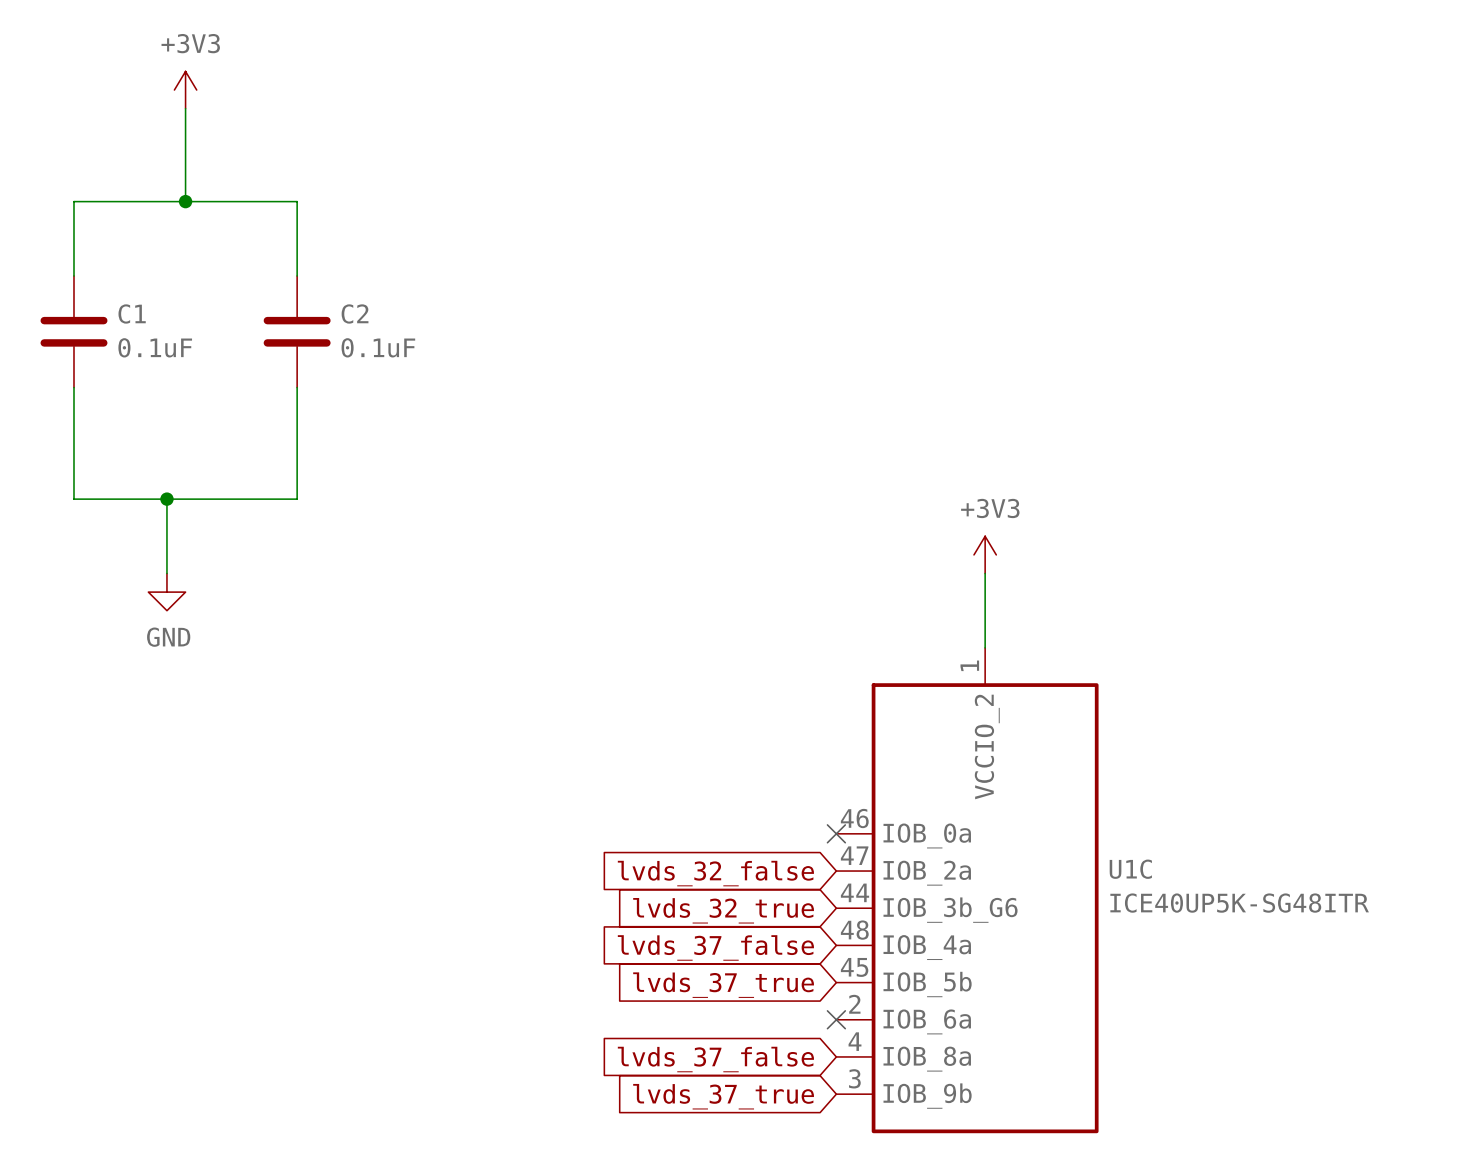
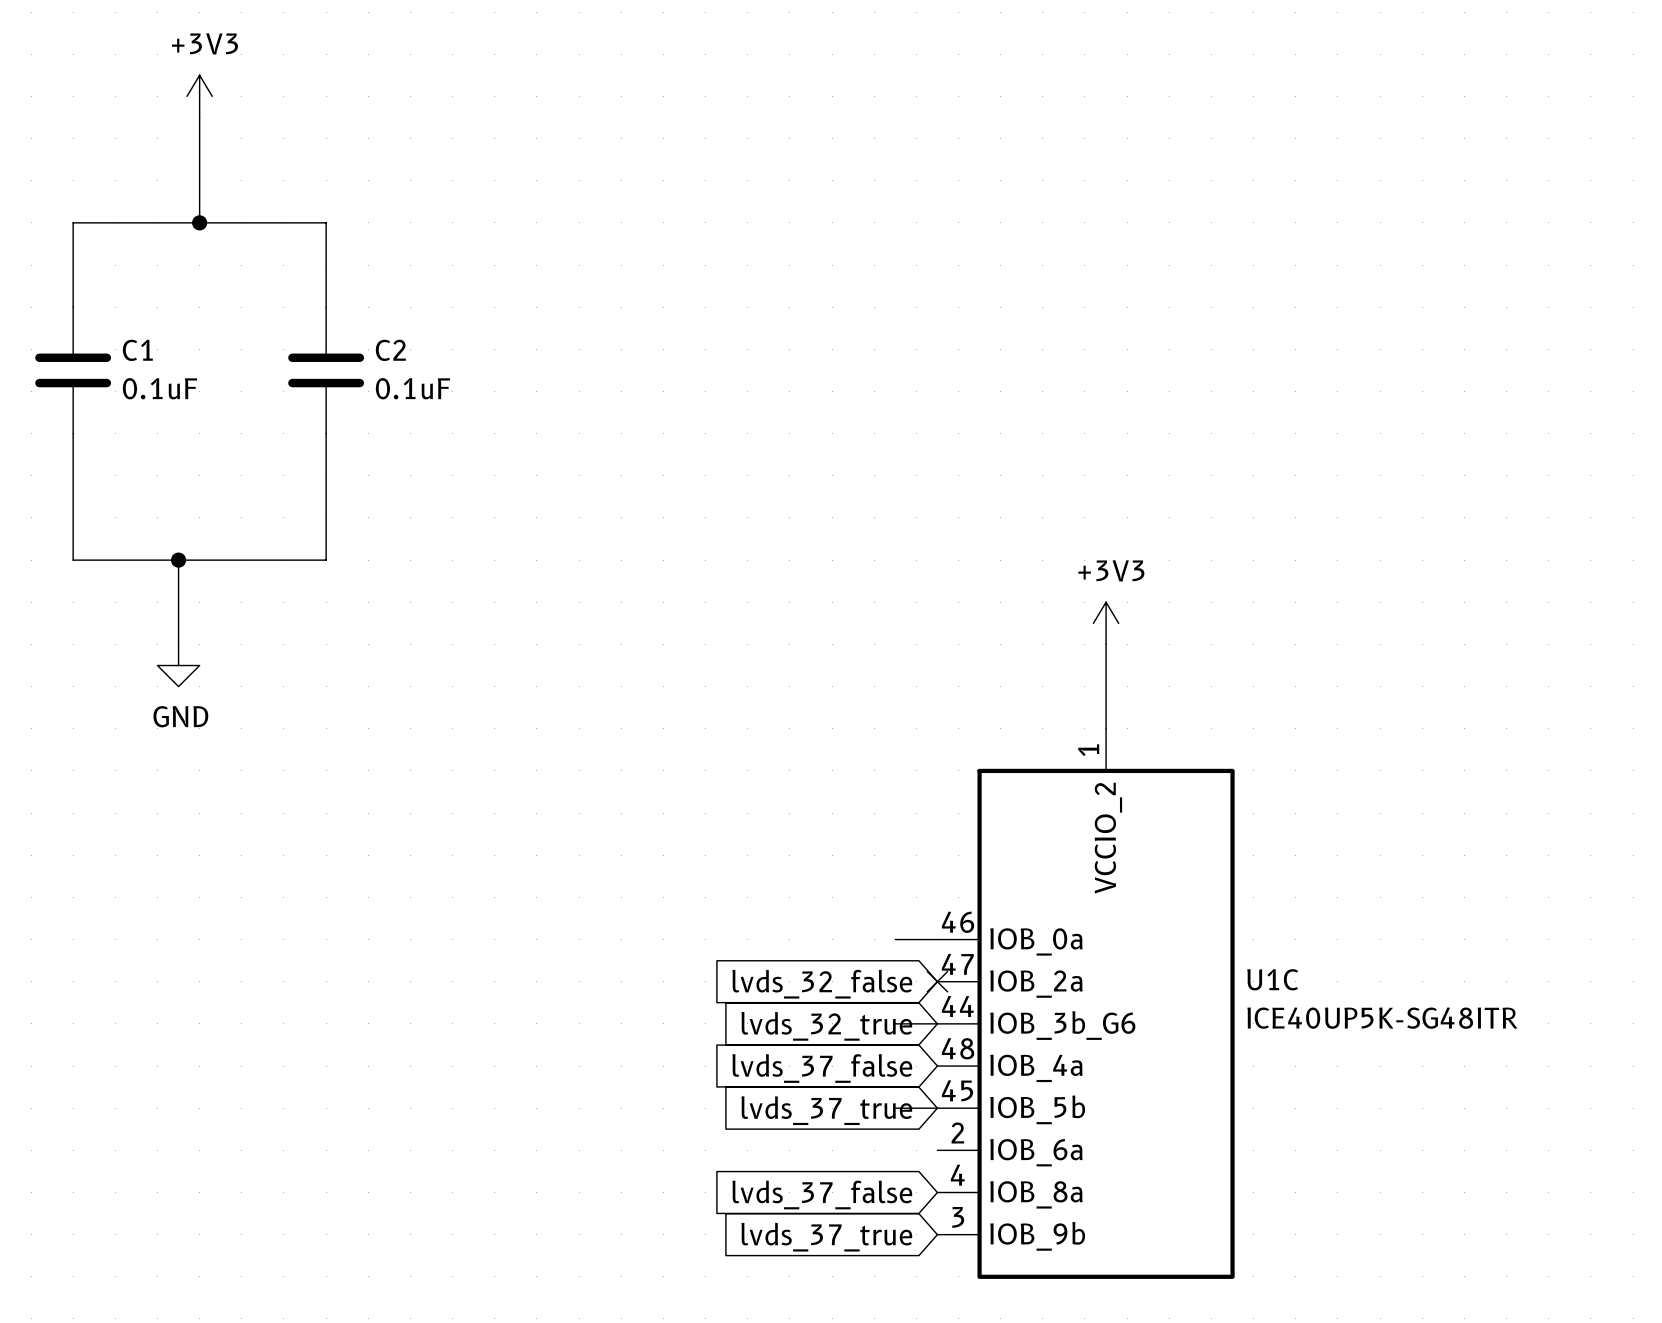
wire: none -> (895, 939) (937, 939)
no-connect mark position: (836, 833) -> (937, 981)
wire: none -> (895, 1023) (937, 1023)
wire: none -> (895, 1108) (937, 1108)
no-connect mark: (836, 1019) -> none

